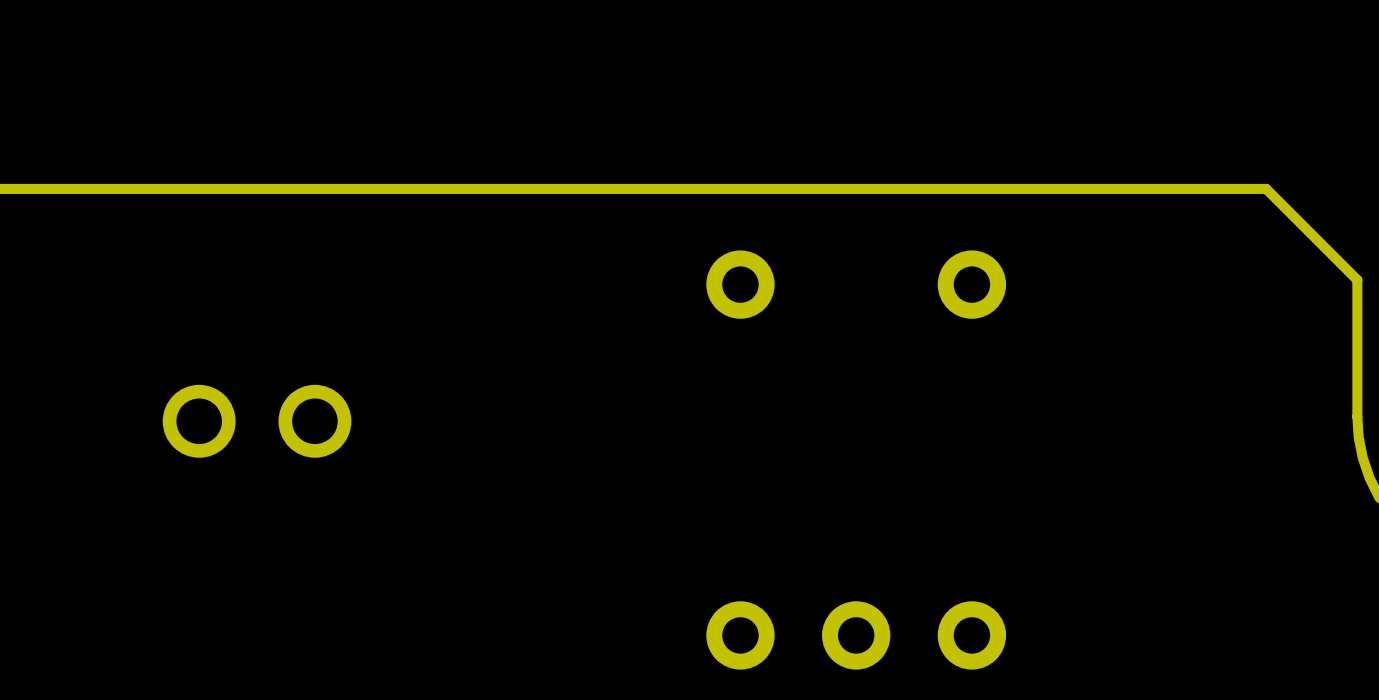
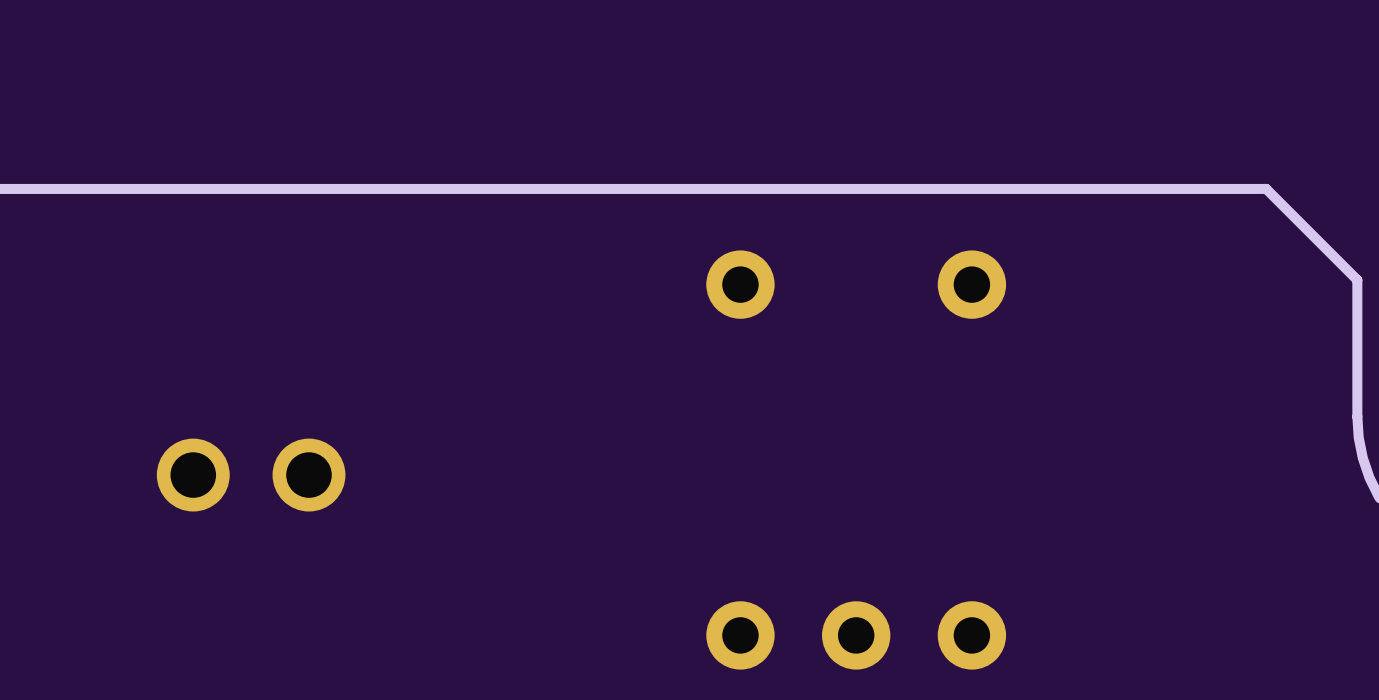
part position: (257, 421) -> (251, 475)

